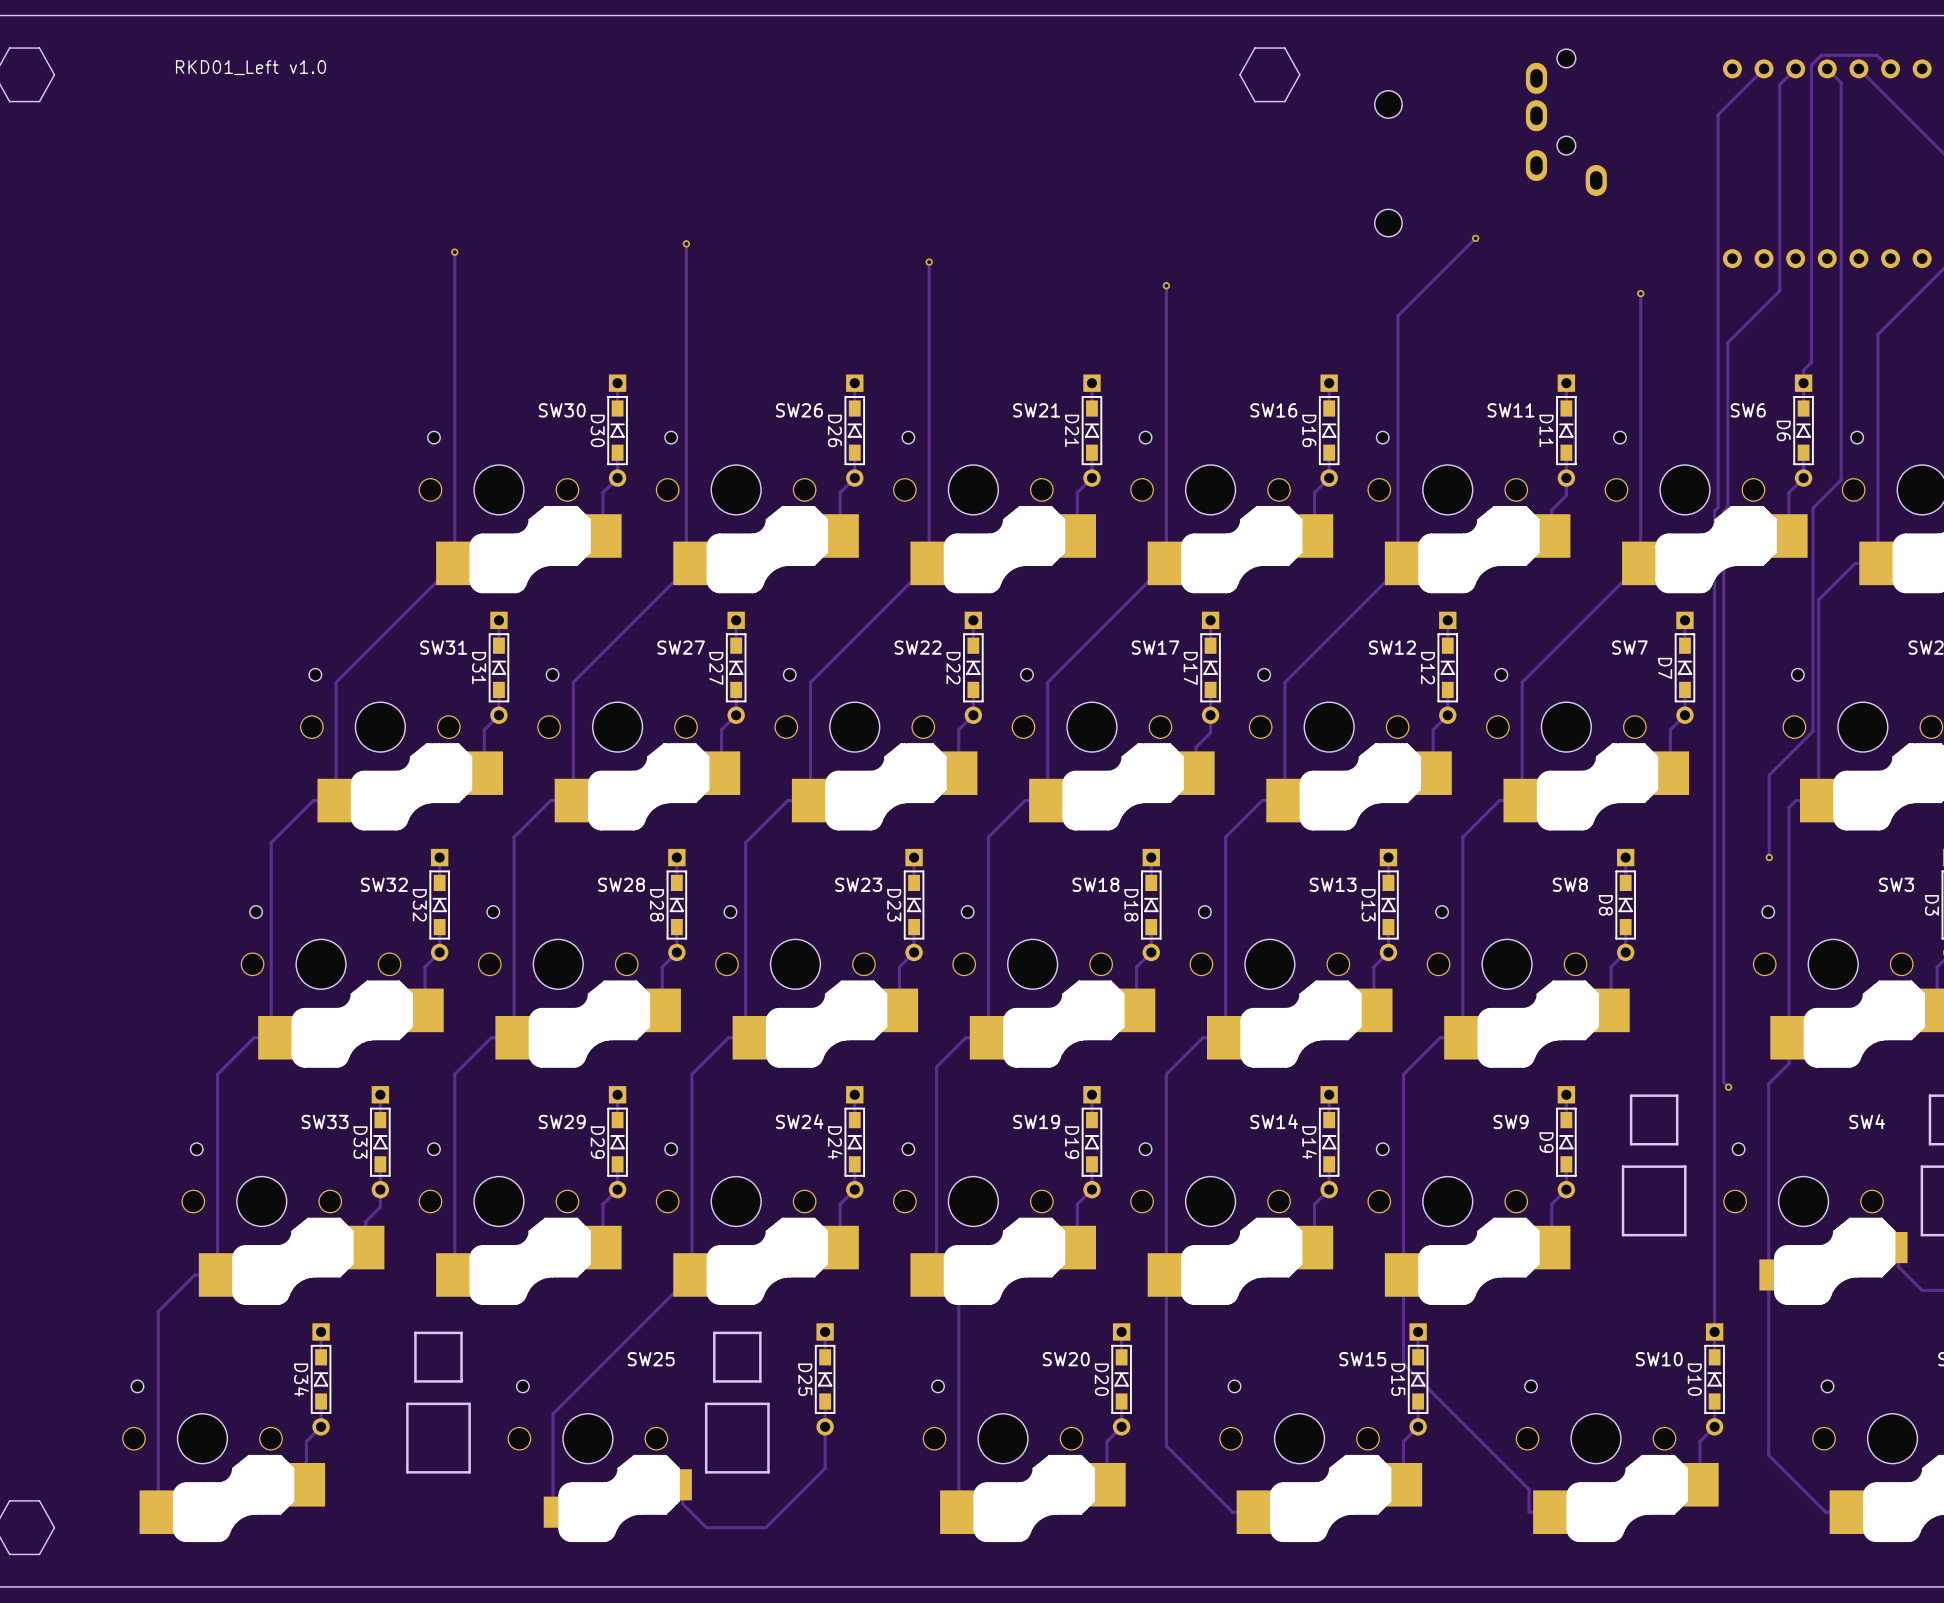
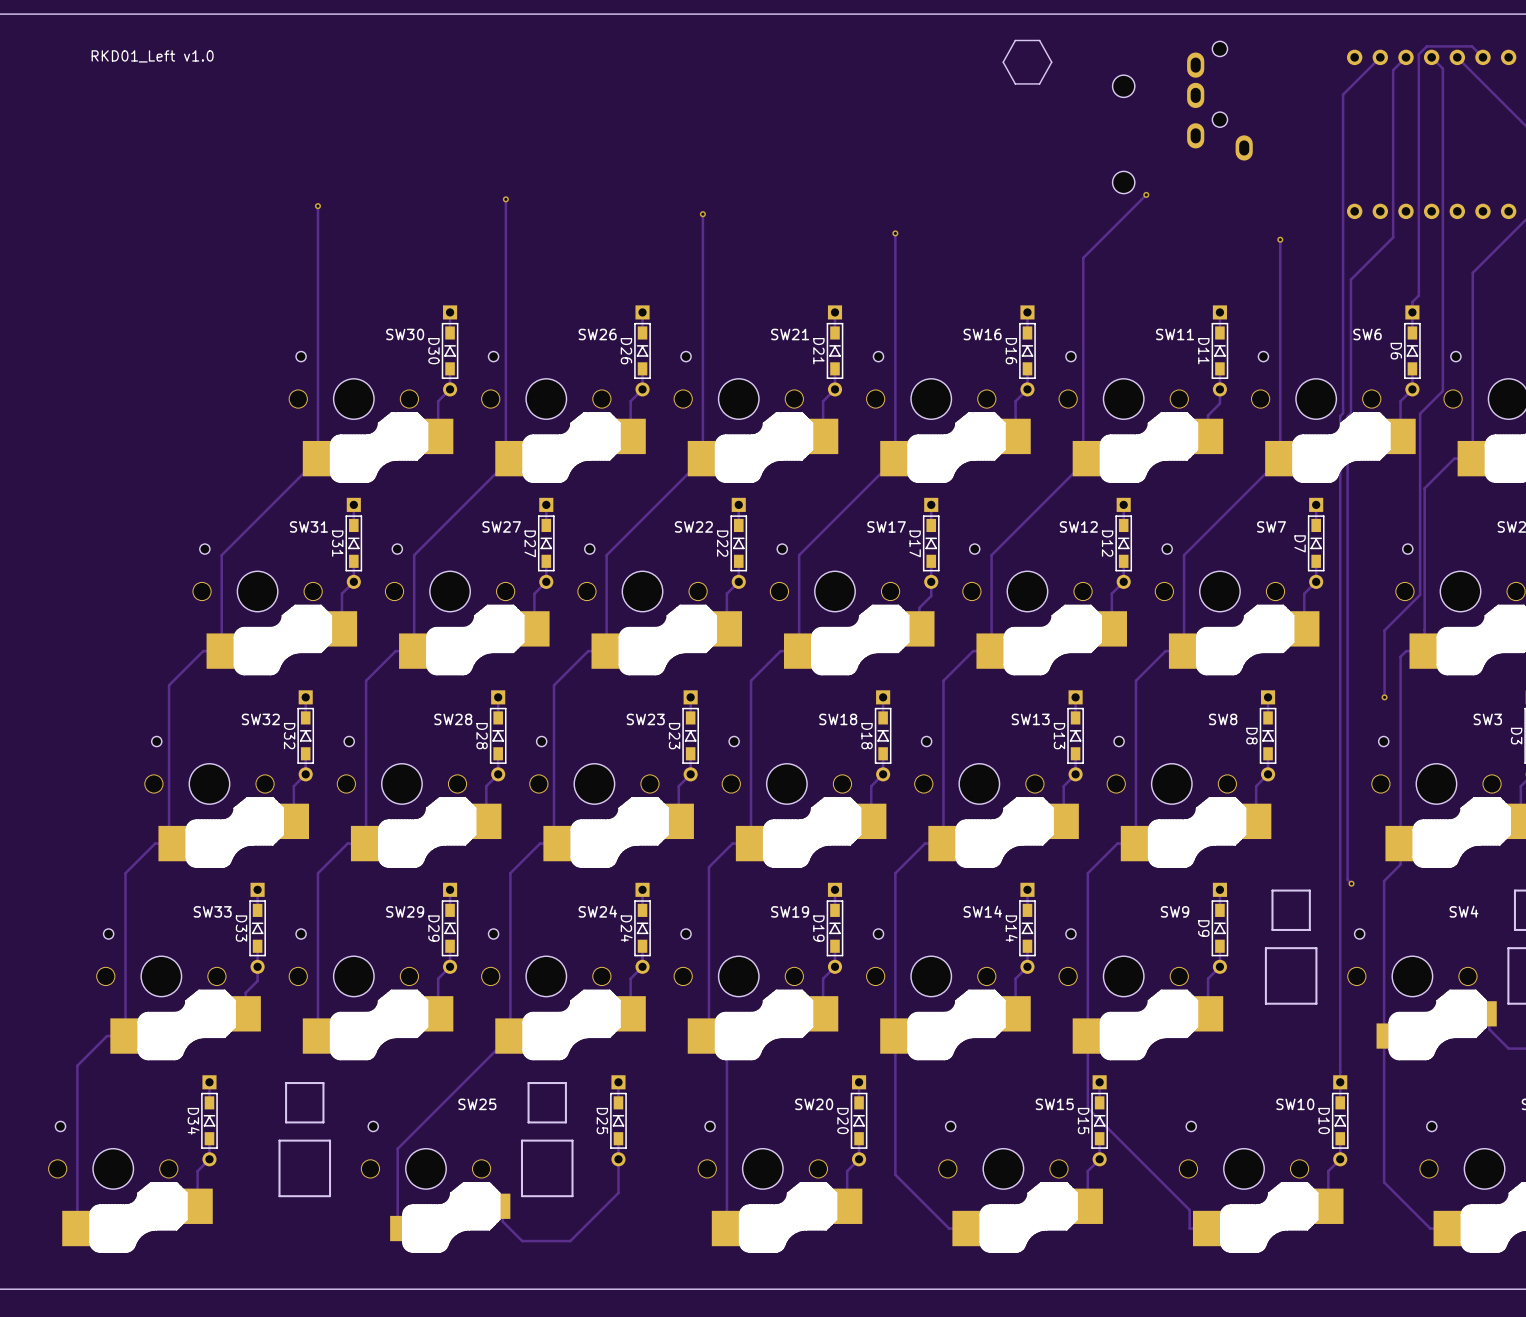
drawing position: (1269, 74) -> (1027, 62)
part position: (1388, 104) -> (1123, 86)
part position: (1388, 223) -> (1123, 182)

